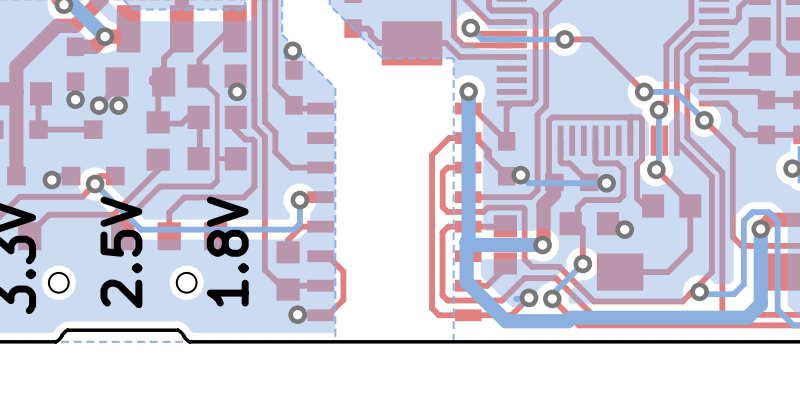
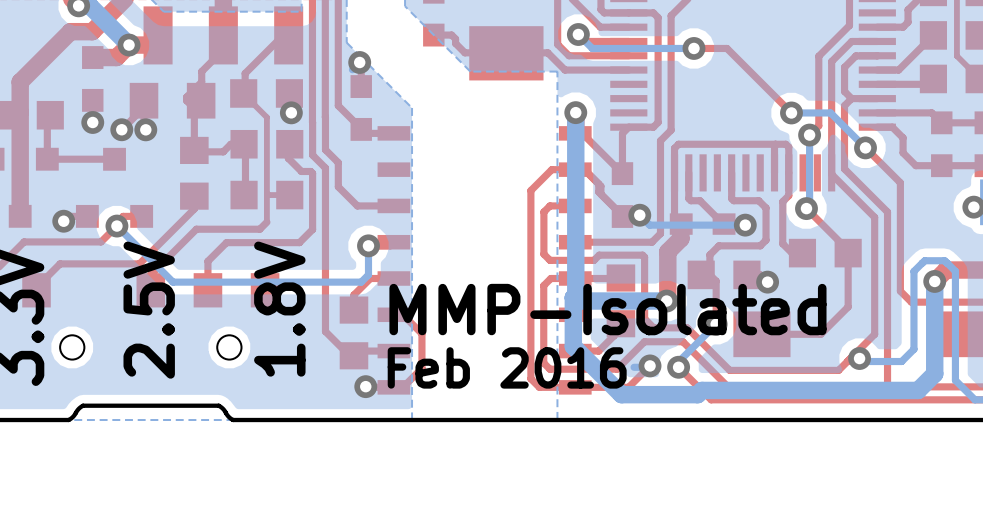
text: none -> MMP-Isolated (607, 309)
text: none -> Feb 2016 (507, 367)

